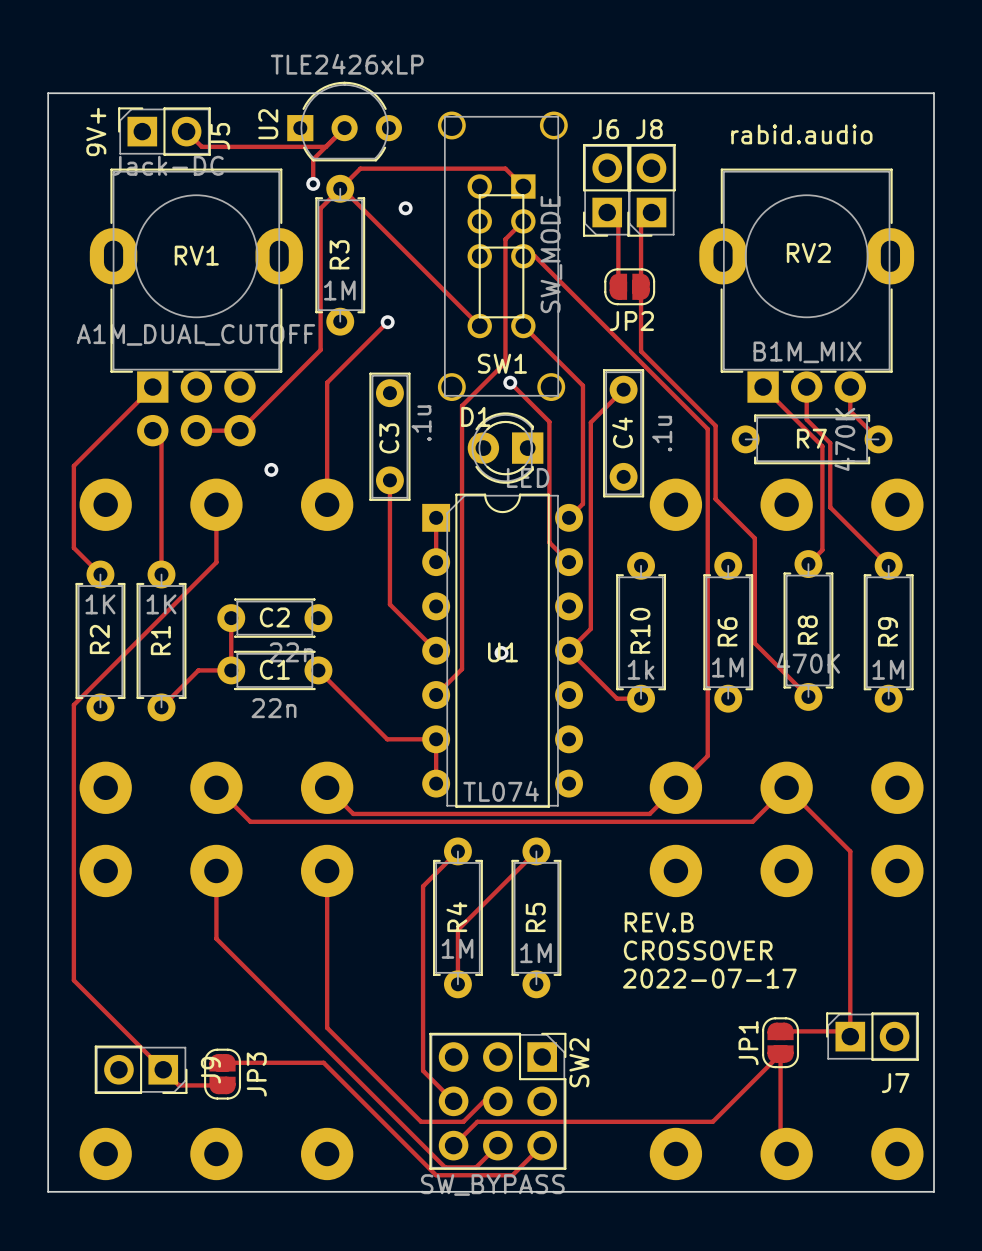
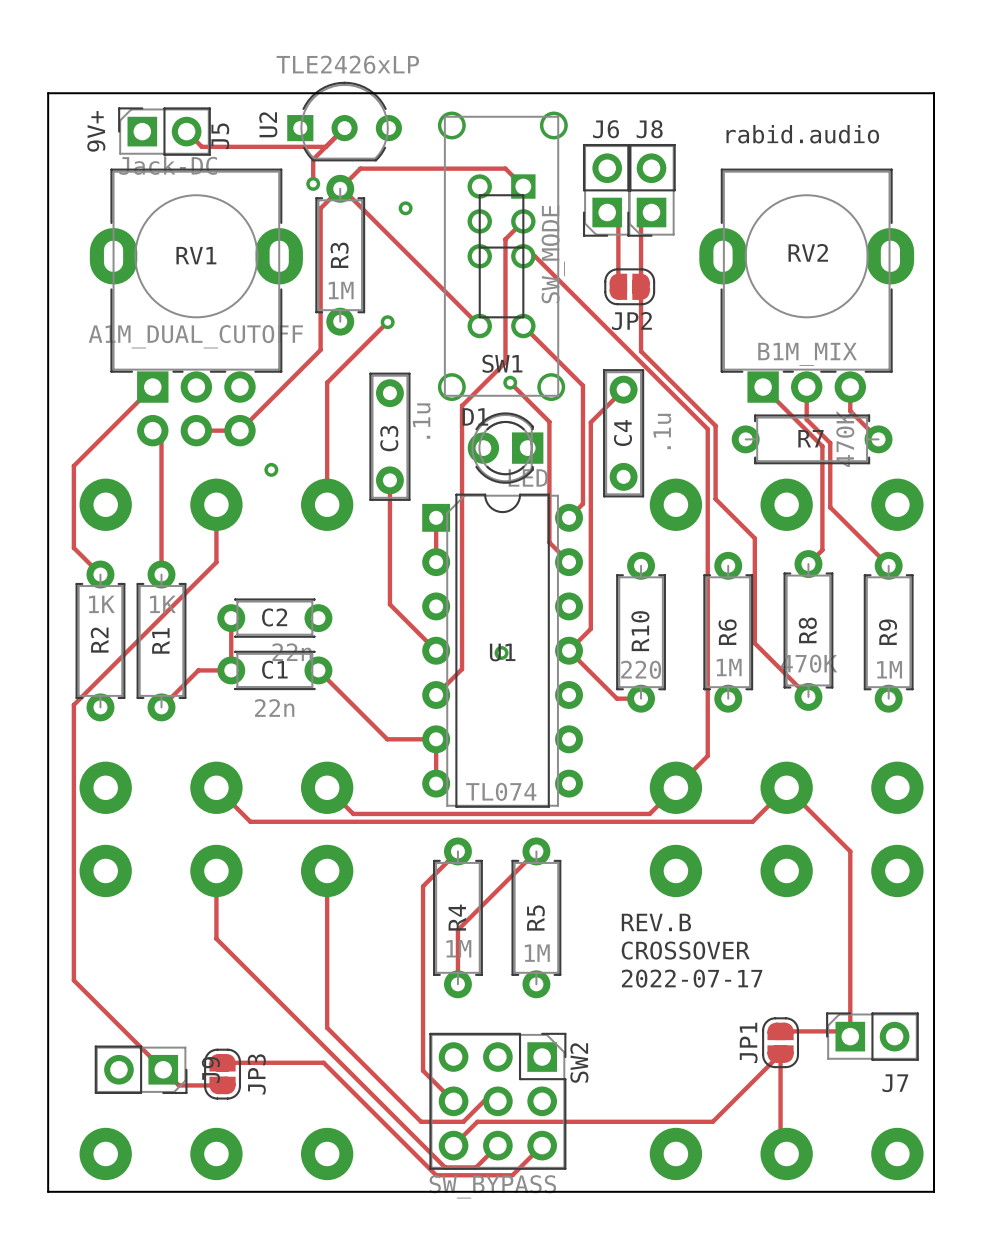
R10 value: 1k (641, 669) -> 220 (641, 669)

